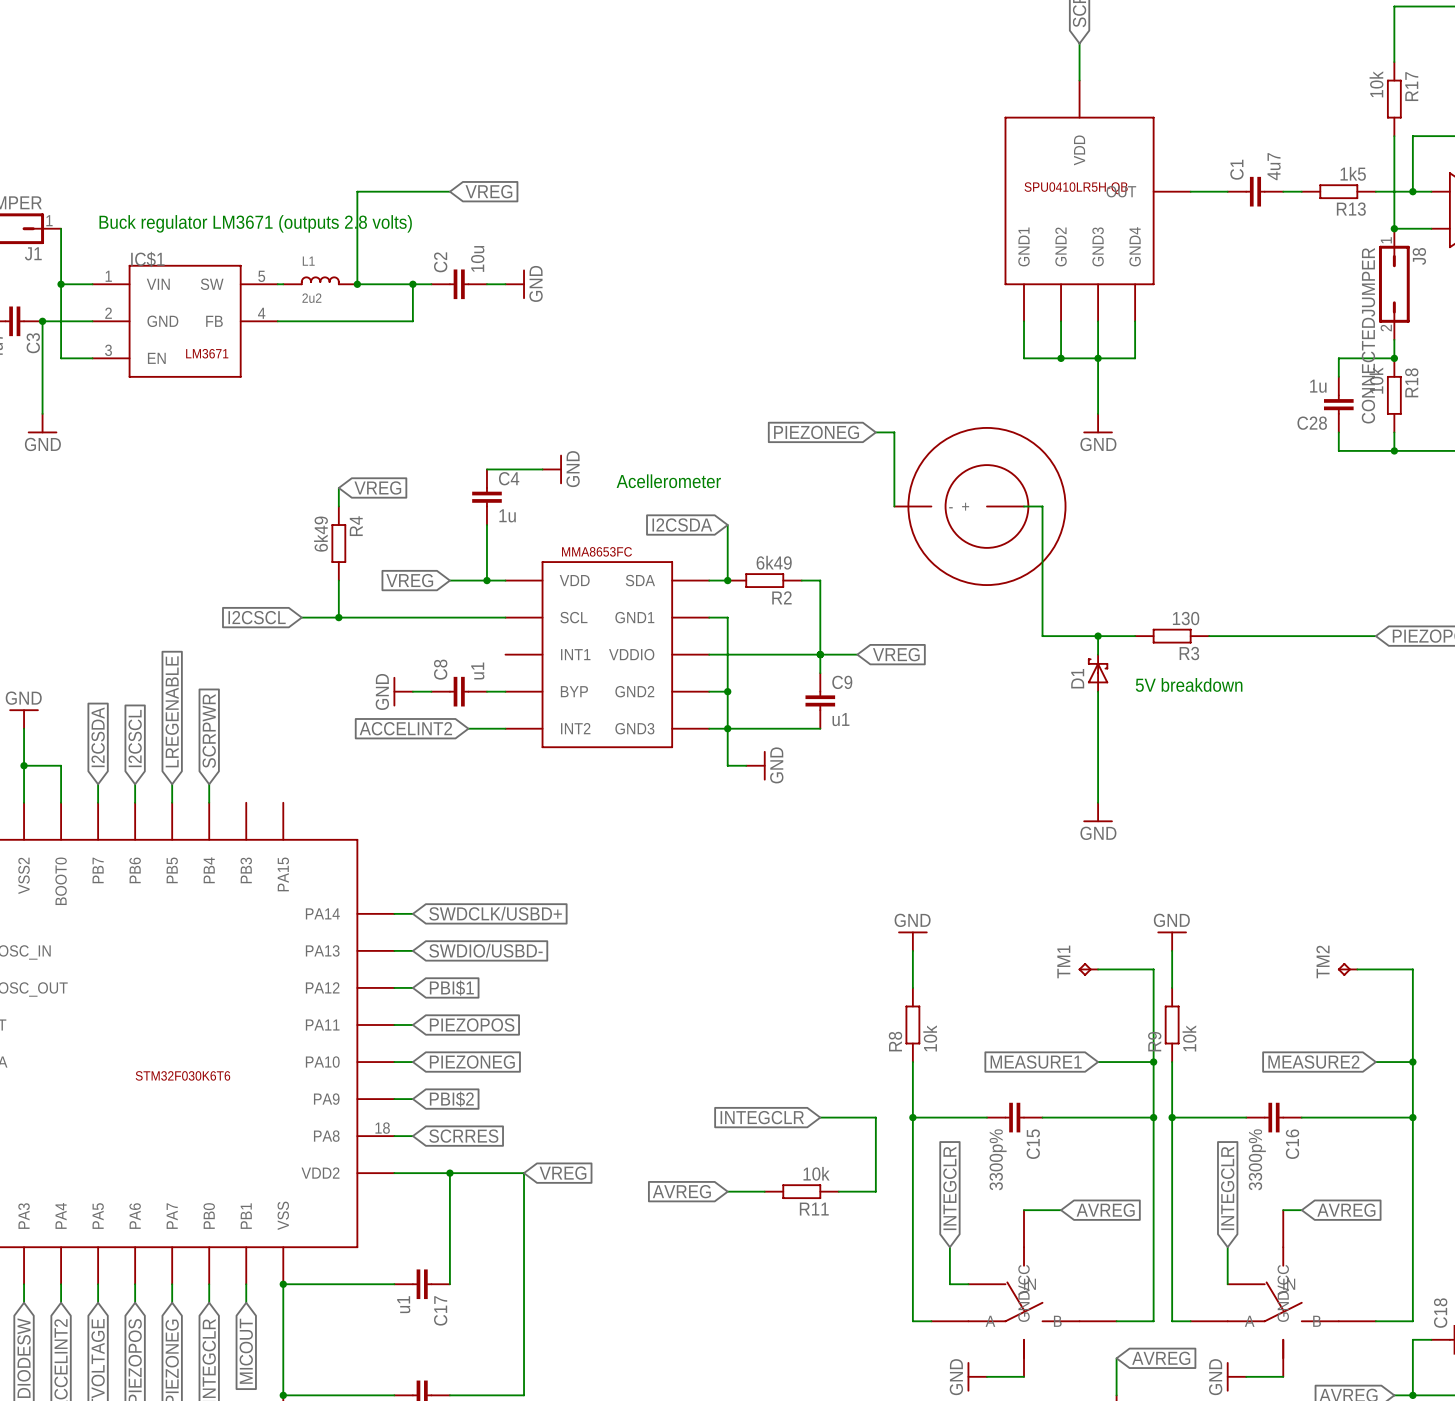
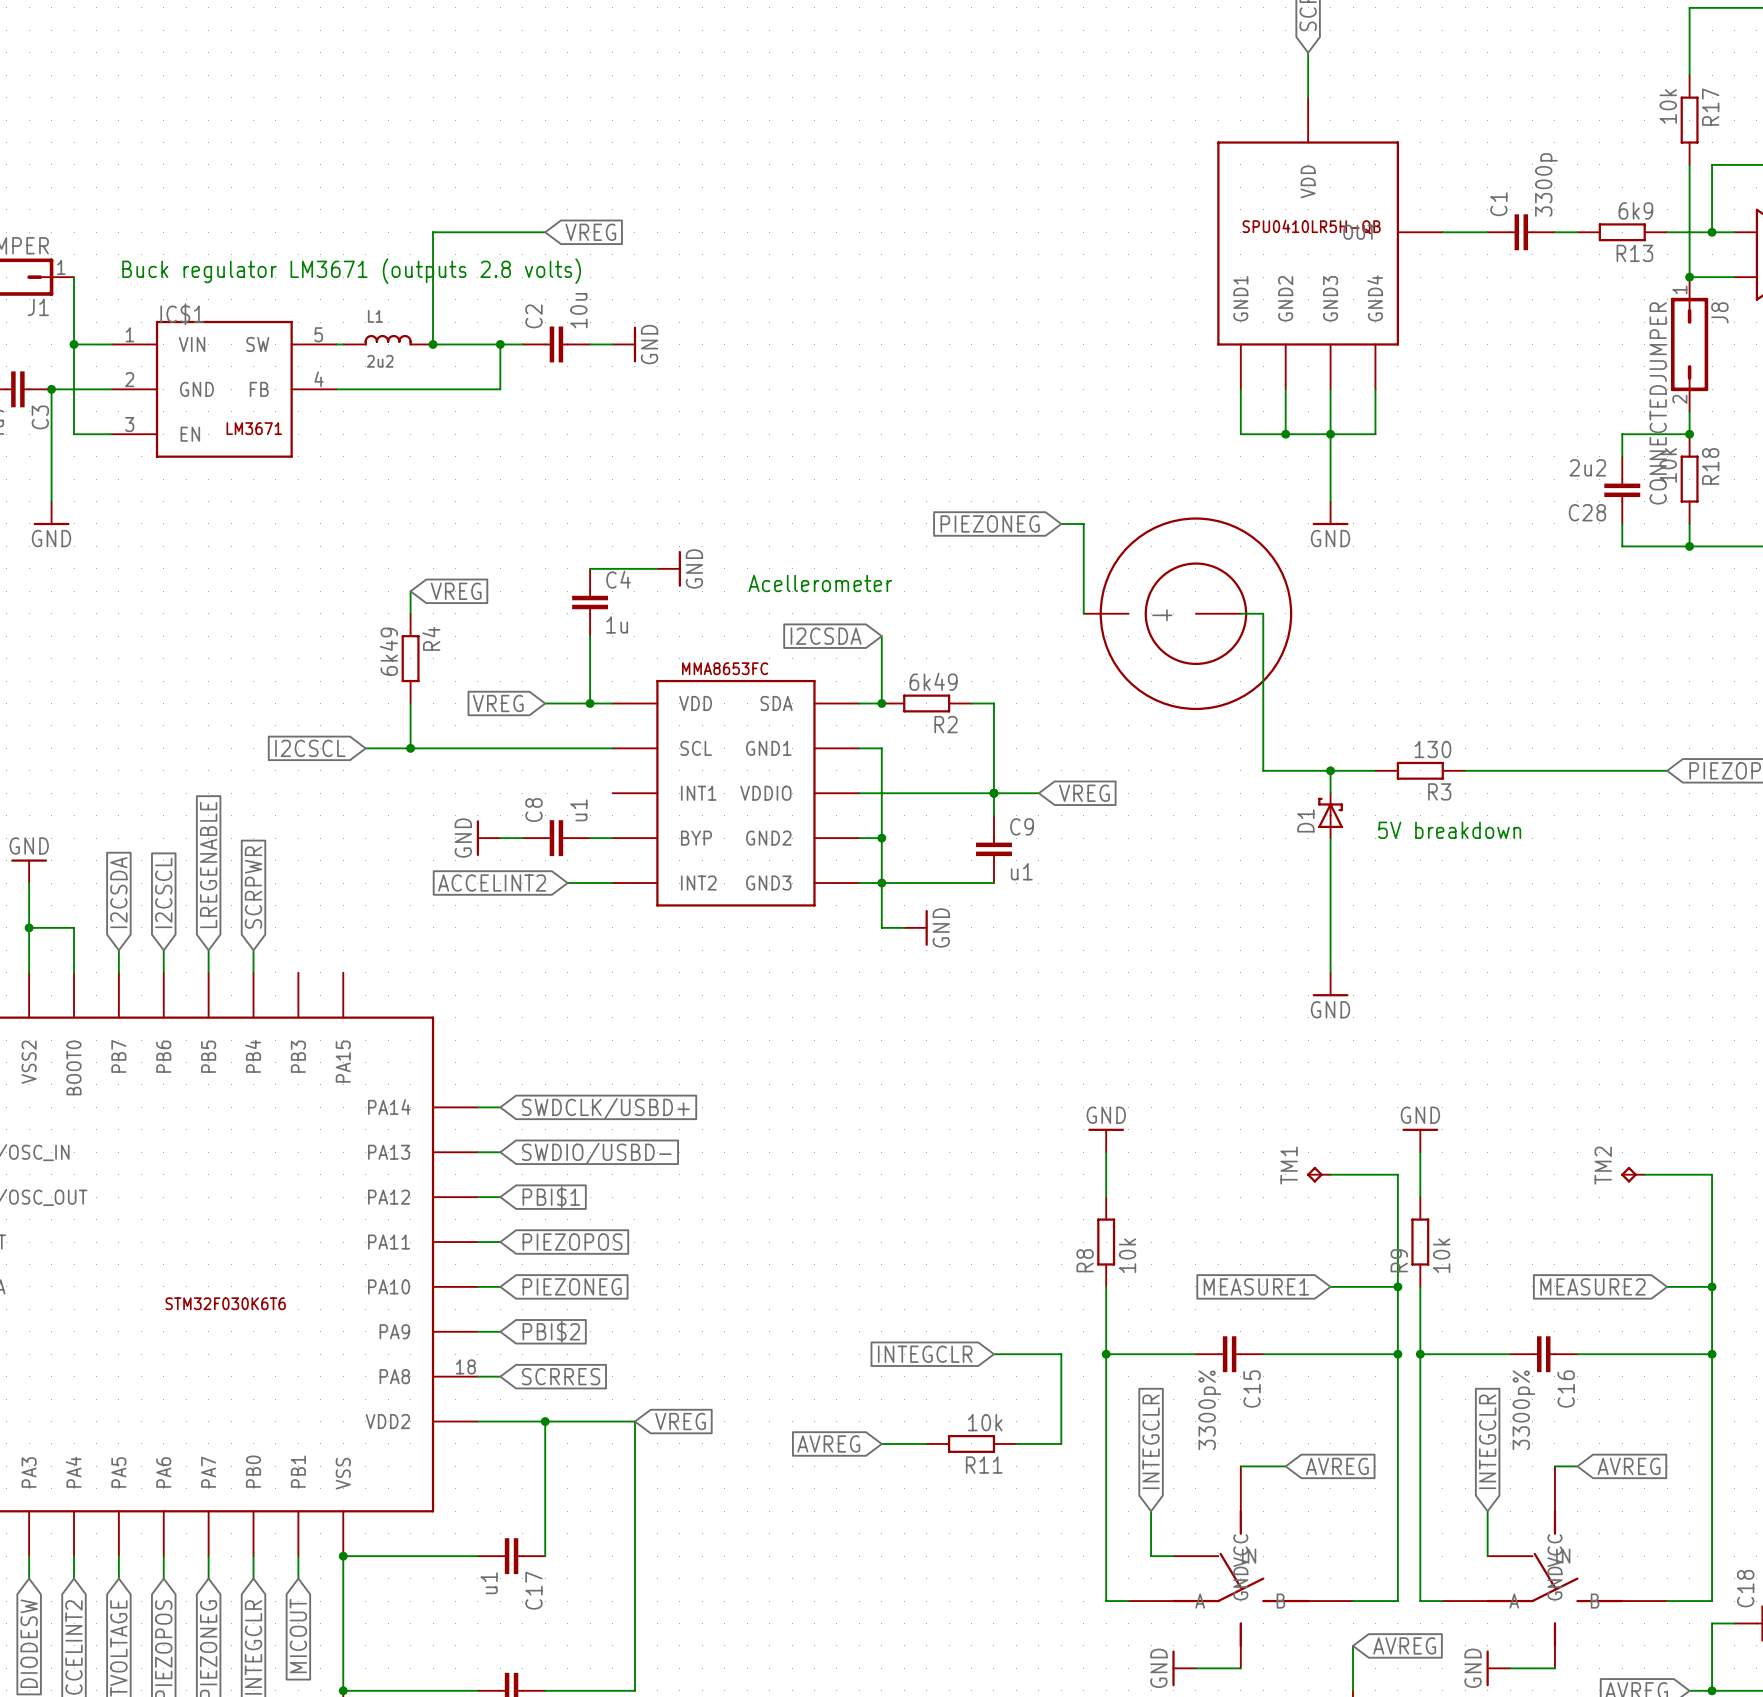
C1 value: 4u7 (1274, 166) -> 3300p (1546, 185)
R13 value: 1k5 (1353, 173) -> 6k9 (1635, 210)
C28 value: 1u (1318, 386) -> 2u2 (1587, 467)

